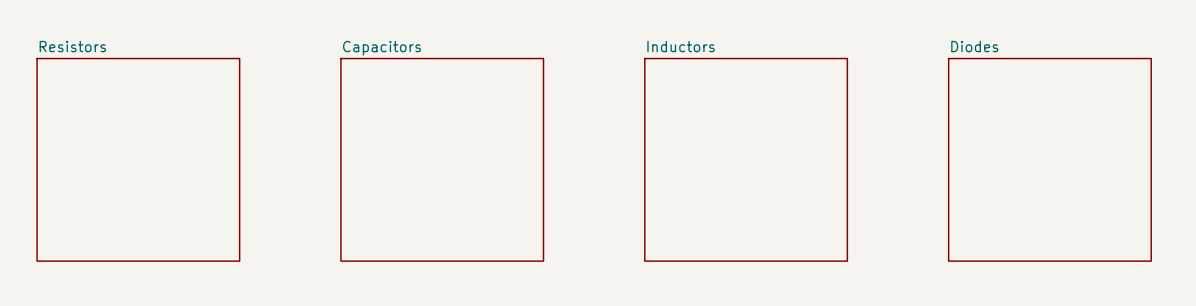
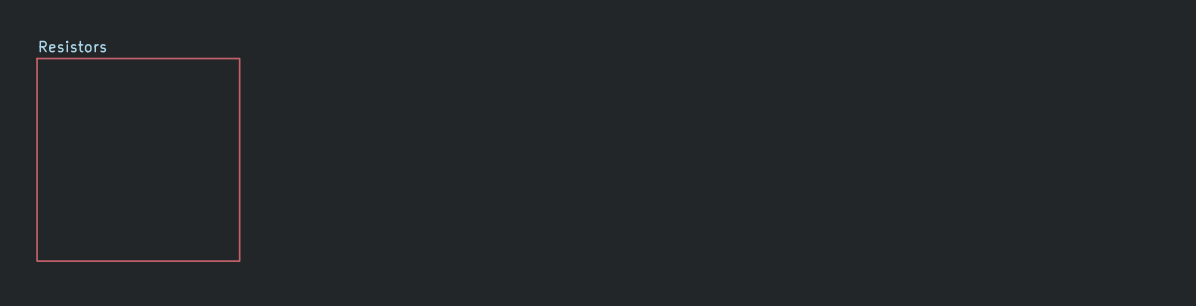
sheet Capacitors: (442, 159) -> none
sheet Inductors: (746, 159) -> none
sheet Diodes: (1049, 159) -> none

